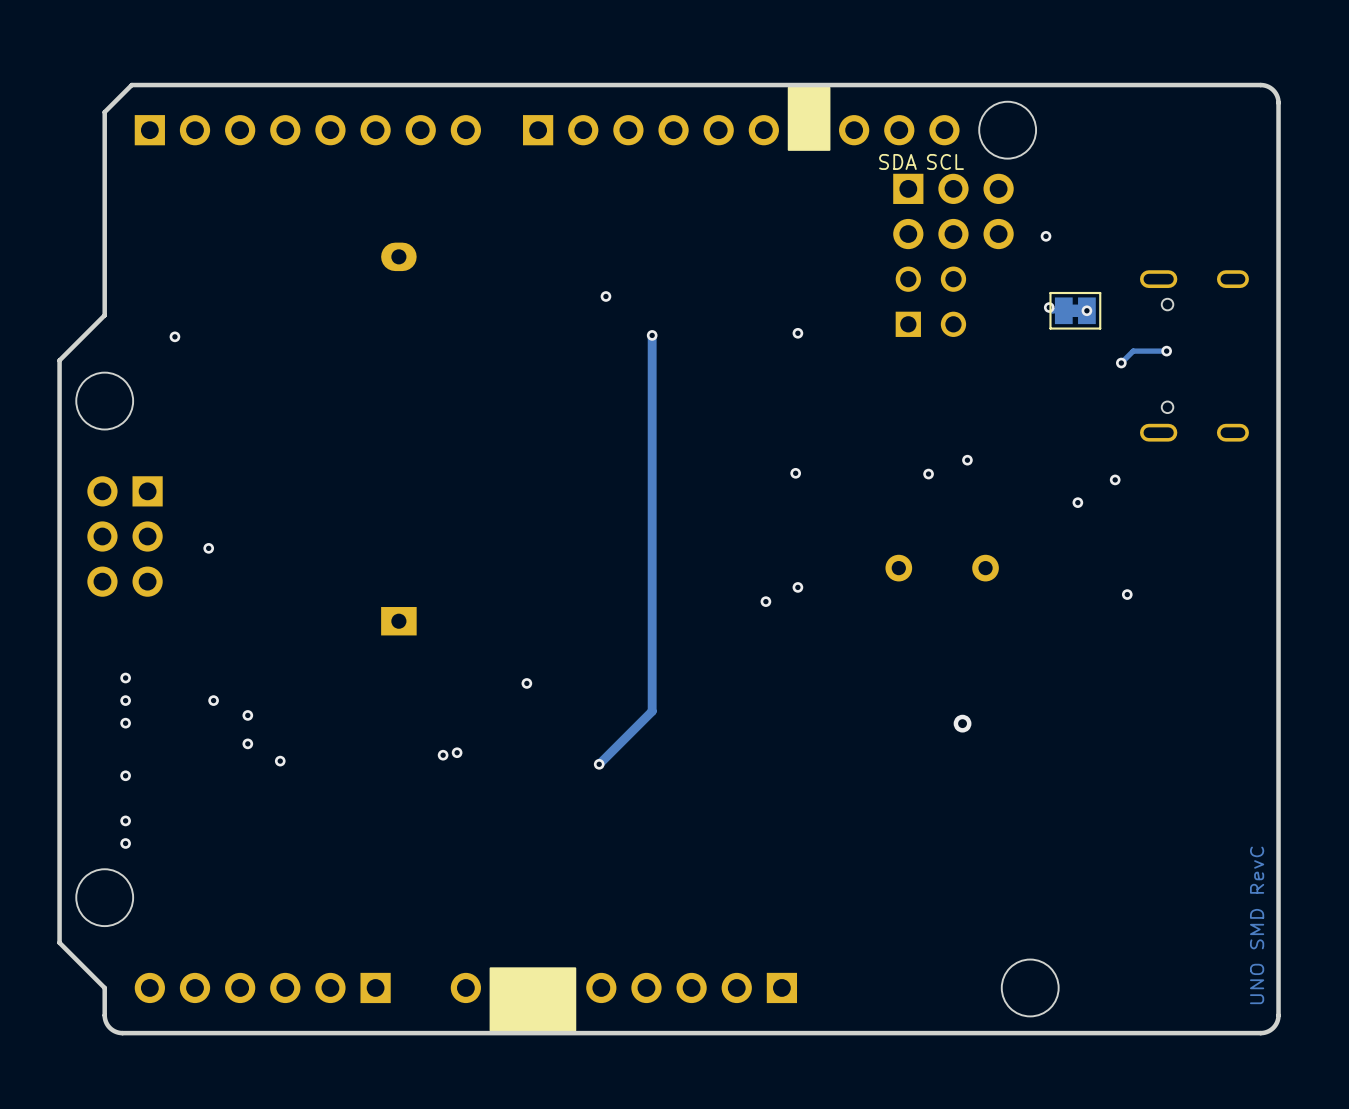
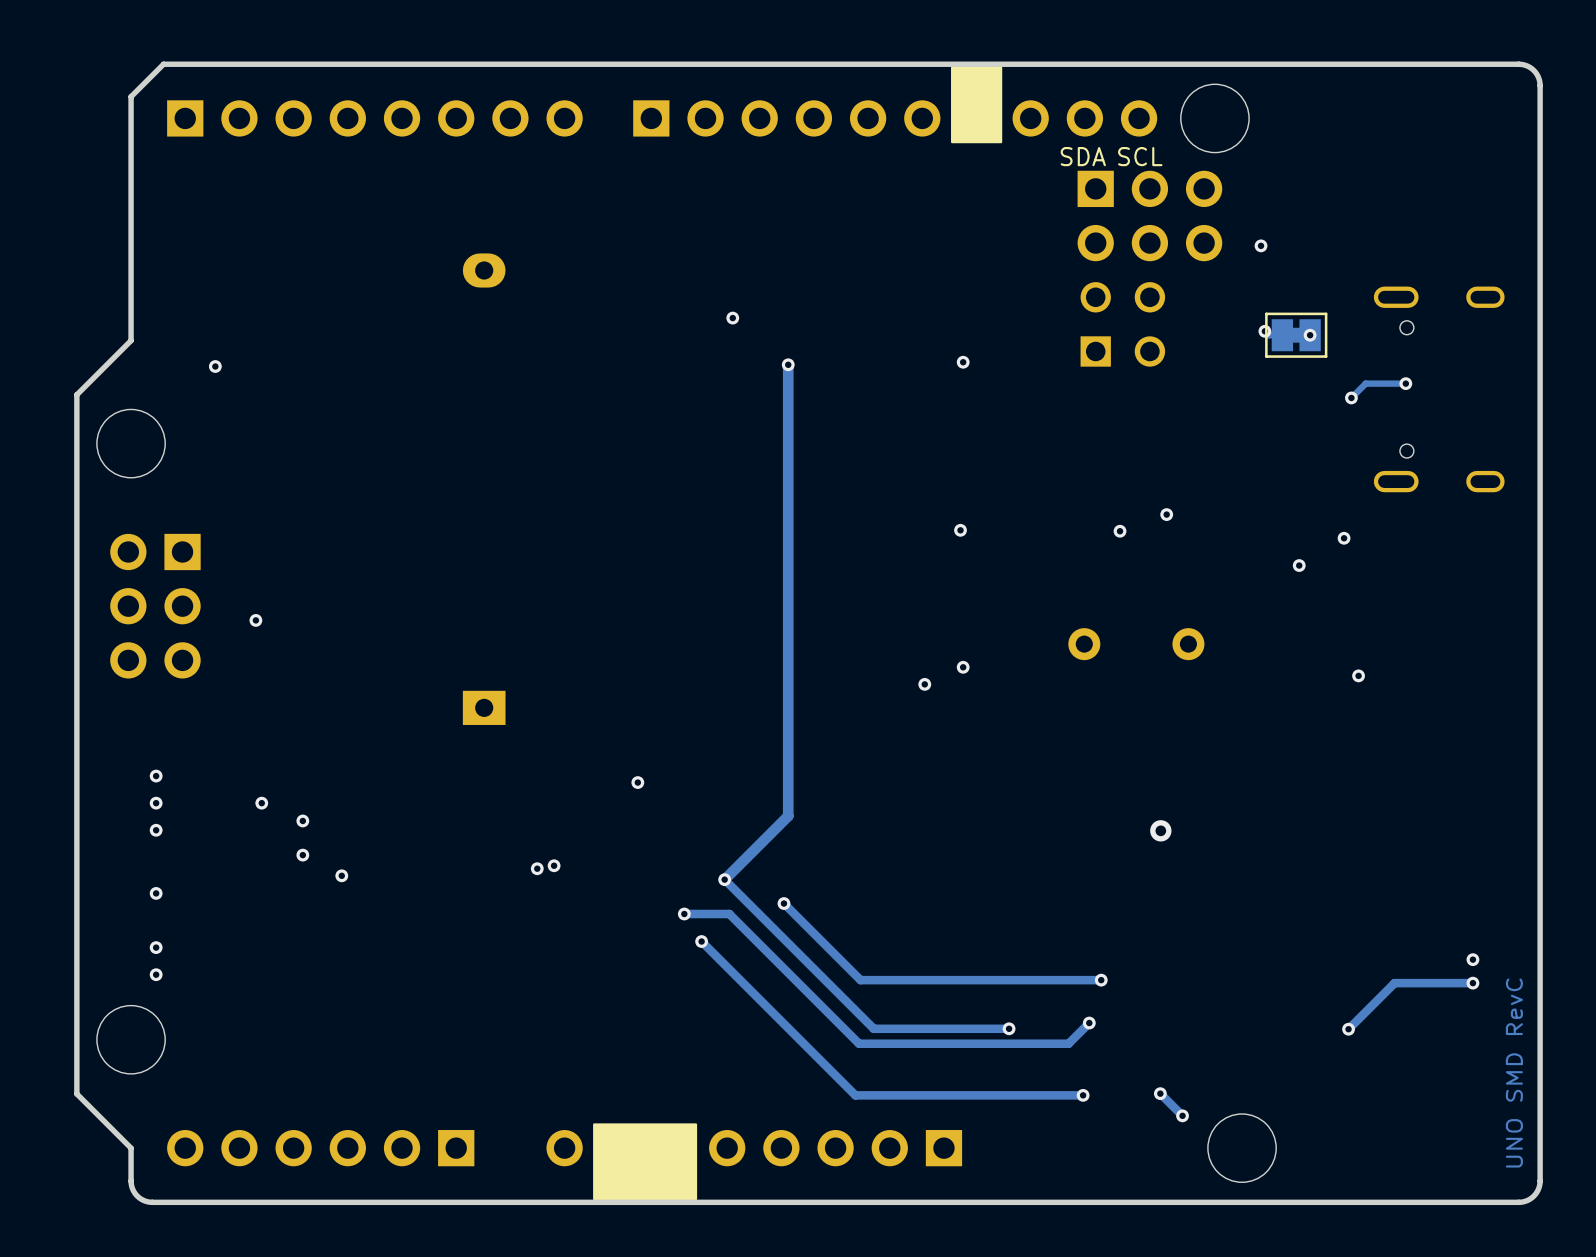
track: none -> (724, 879) (873, 1028) (1009, 1028)
track: none -> (783, 903) (860, 980) (1101, 980)
via: none -> (783, 903)
track: none -> (684, 914) (729, 914) (859, 1043) (1068, 1043) (1089, 1023)
via: none -> (684, 914)
track: none -> (701, 941) (855, 1095) (1083, 1095)
via: none -> (701, 941)
via: none -> (1472, 959)
via: none -> (1101, 980)
track: none -> (1472, 983) (1394, 983) (1348, 1029)
via: none -> (1472, 983)
via: none -> (1089, 1023)
via: none -> (1009, 1028)
via: none -> (1348, 1029)
track: none -> (1160, 1093) (1182, 1115)
via: none -> (1160, 1093)
via: none -> (1083, 1095)
via: none -> (1182, 1115)

